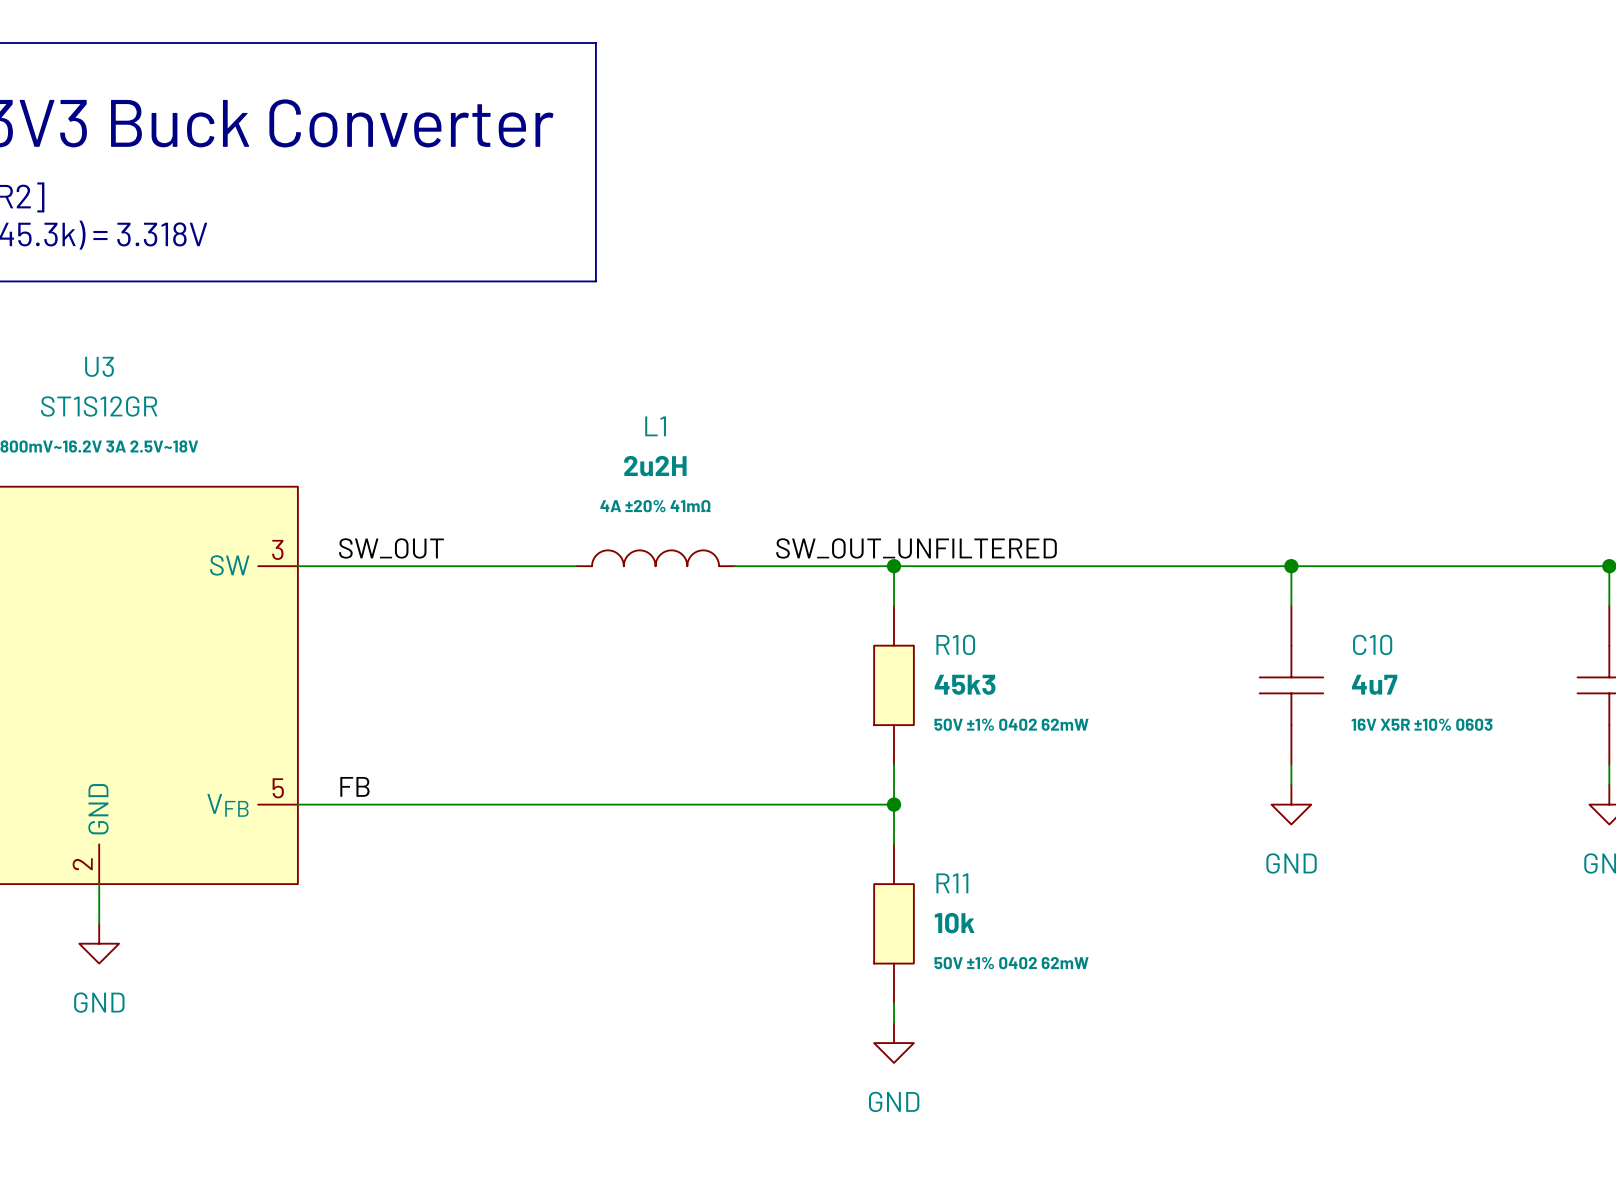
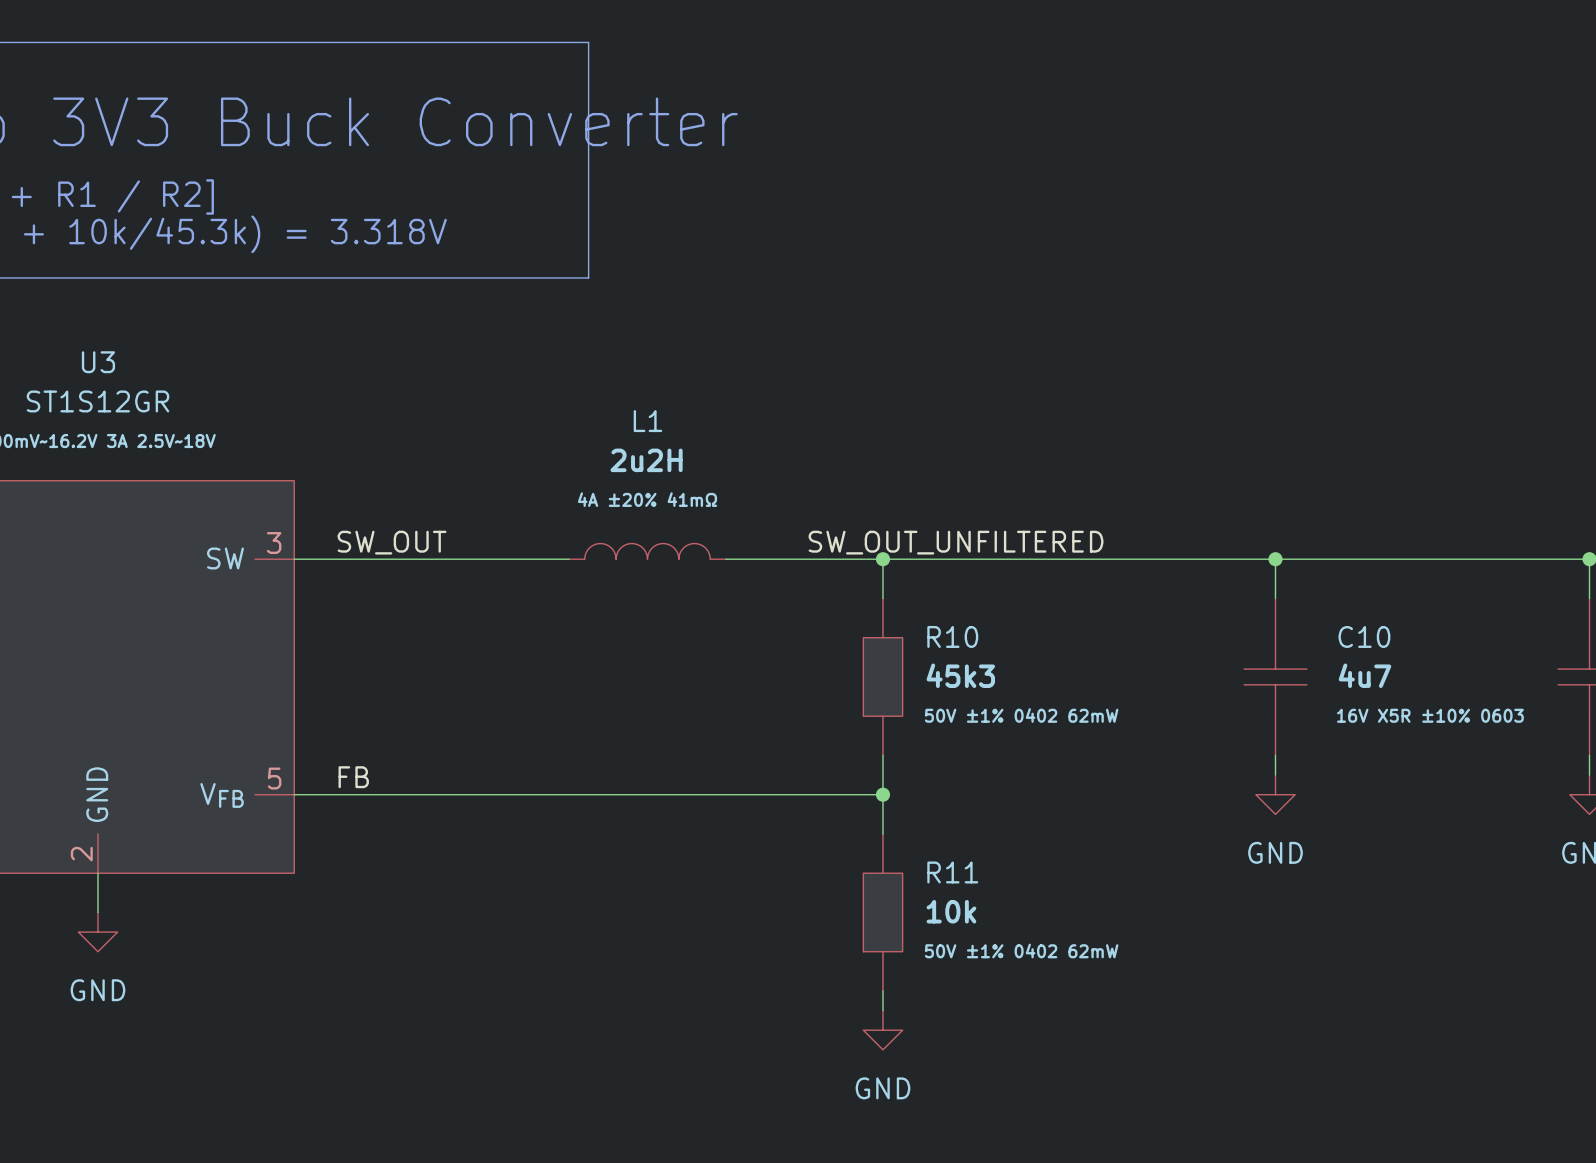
label position: SW_OUT_UNFILTERED (916, 548) -> SW_OUT_UNFILTERED (956, 542)

